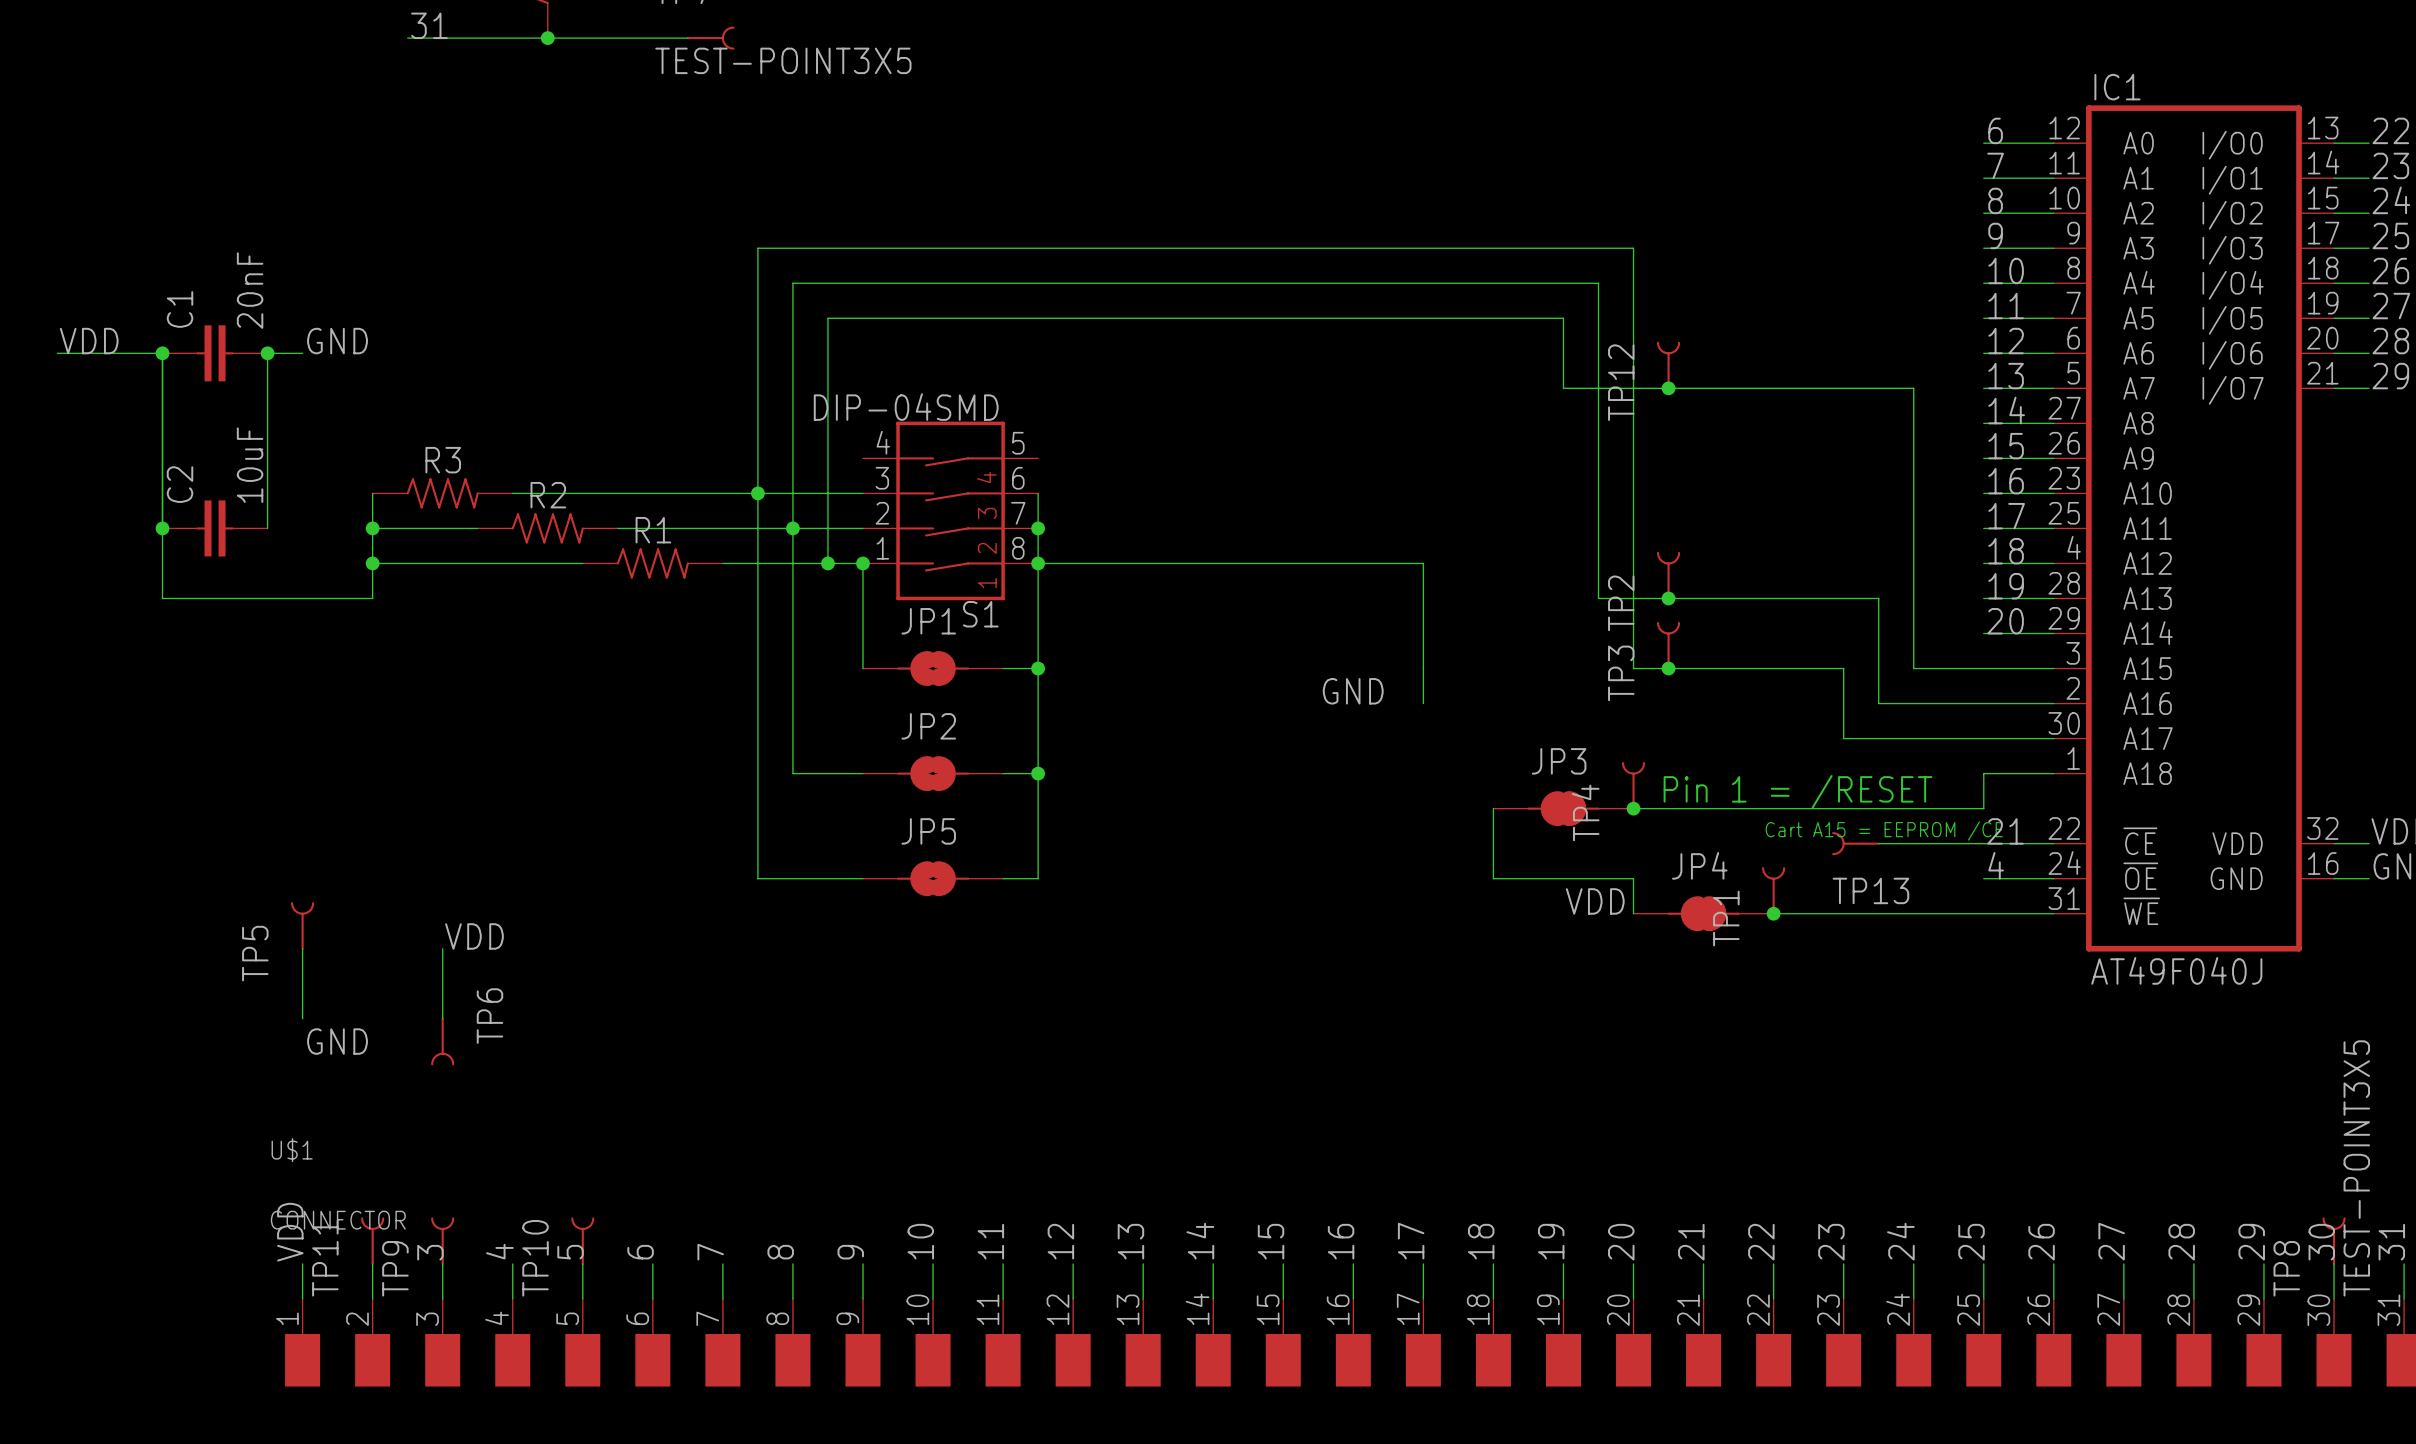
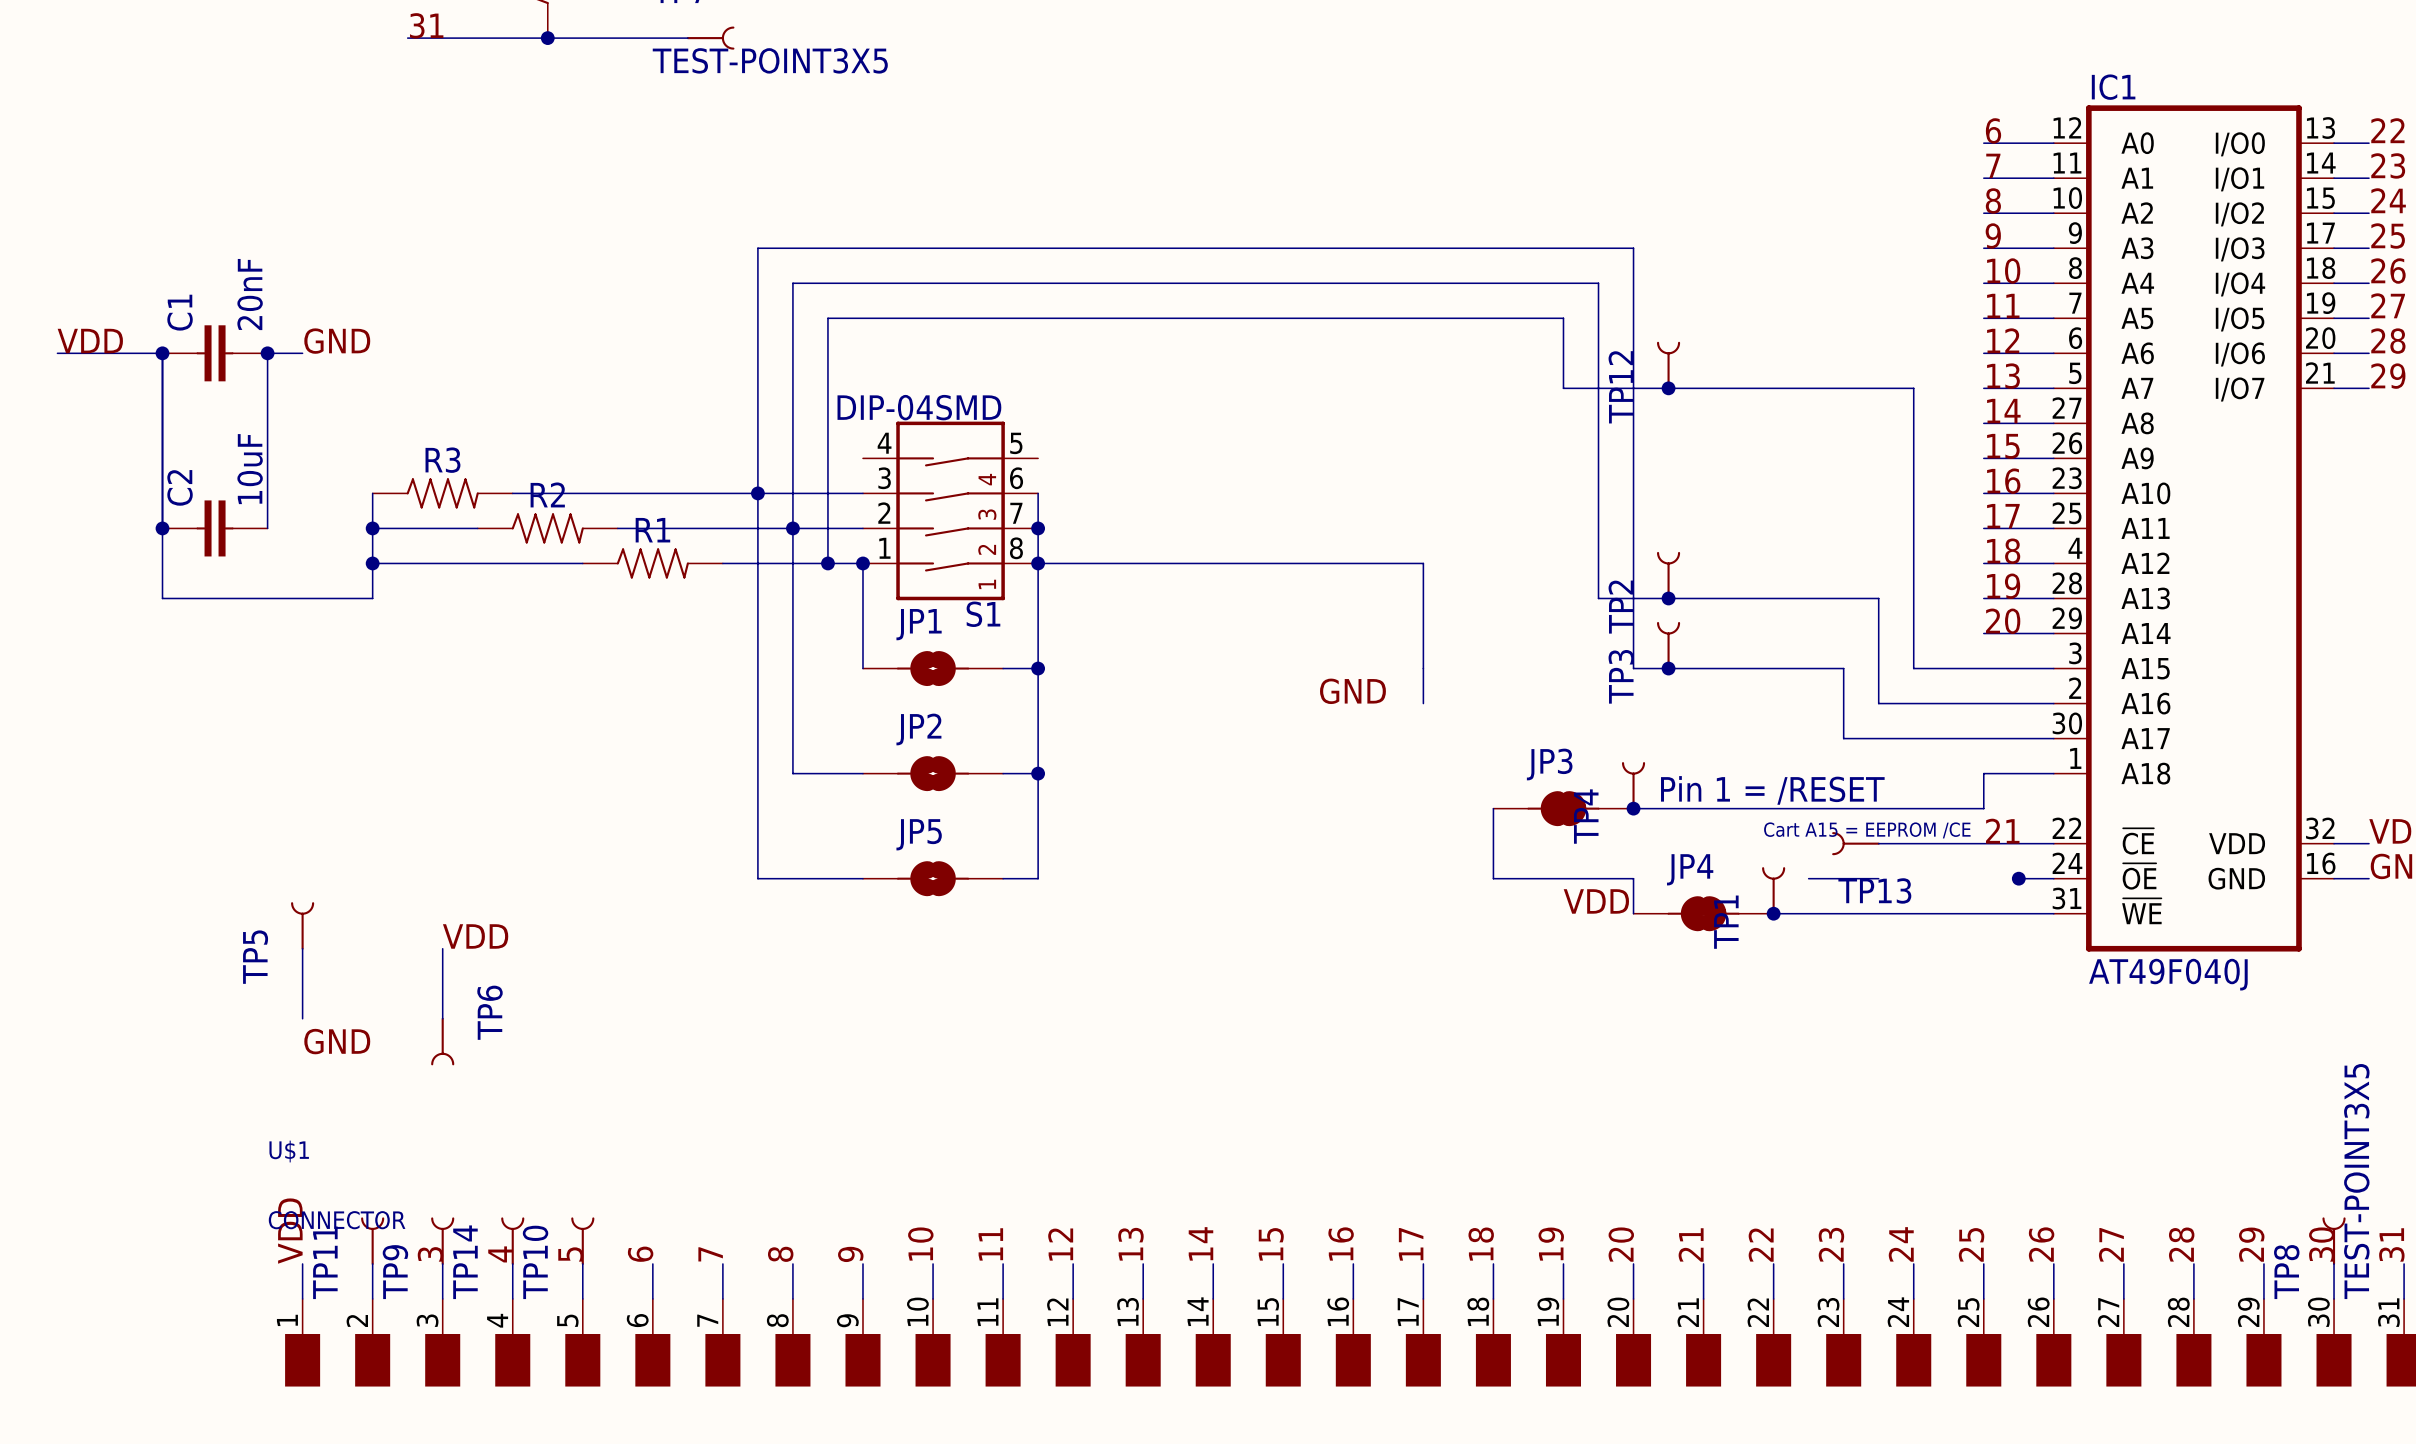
label: 4 (1996, 865) -> none
wire: none -> (1808, 878) (1878, 878)
wire: (1983, 878) (2018, 878) -> none
junction: none -> (2018, 878)
TP14: none -> (512, 1241)

